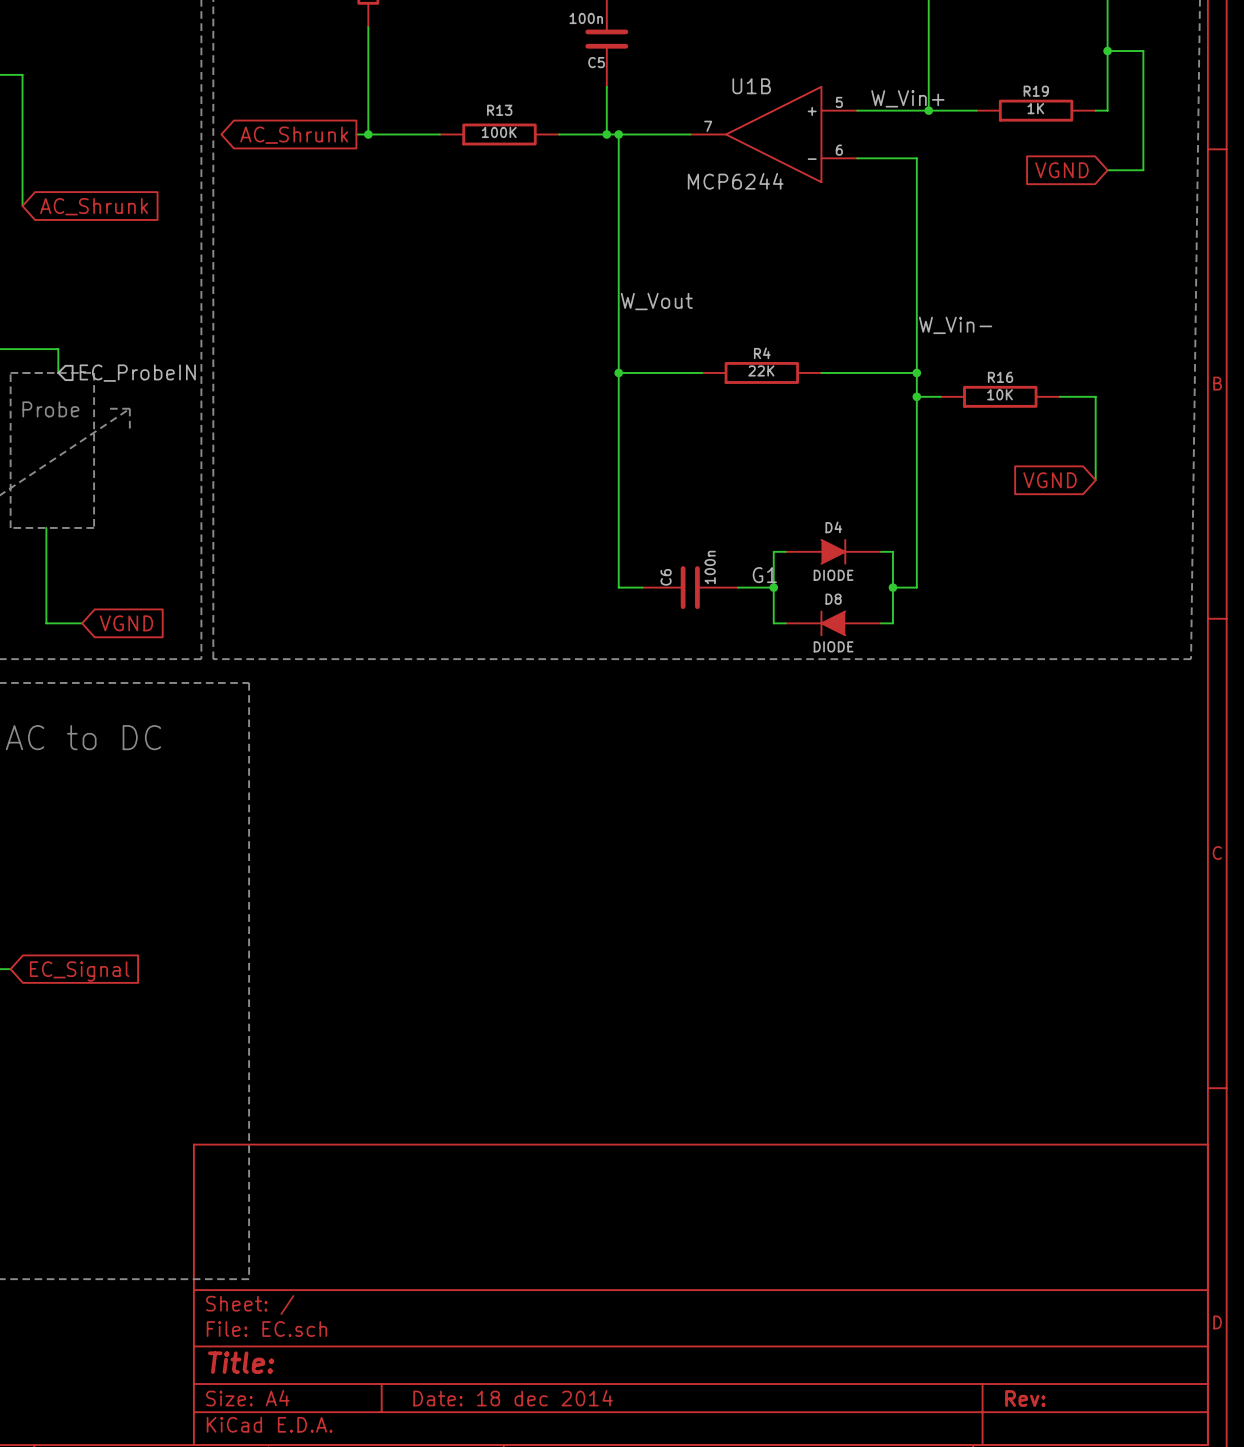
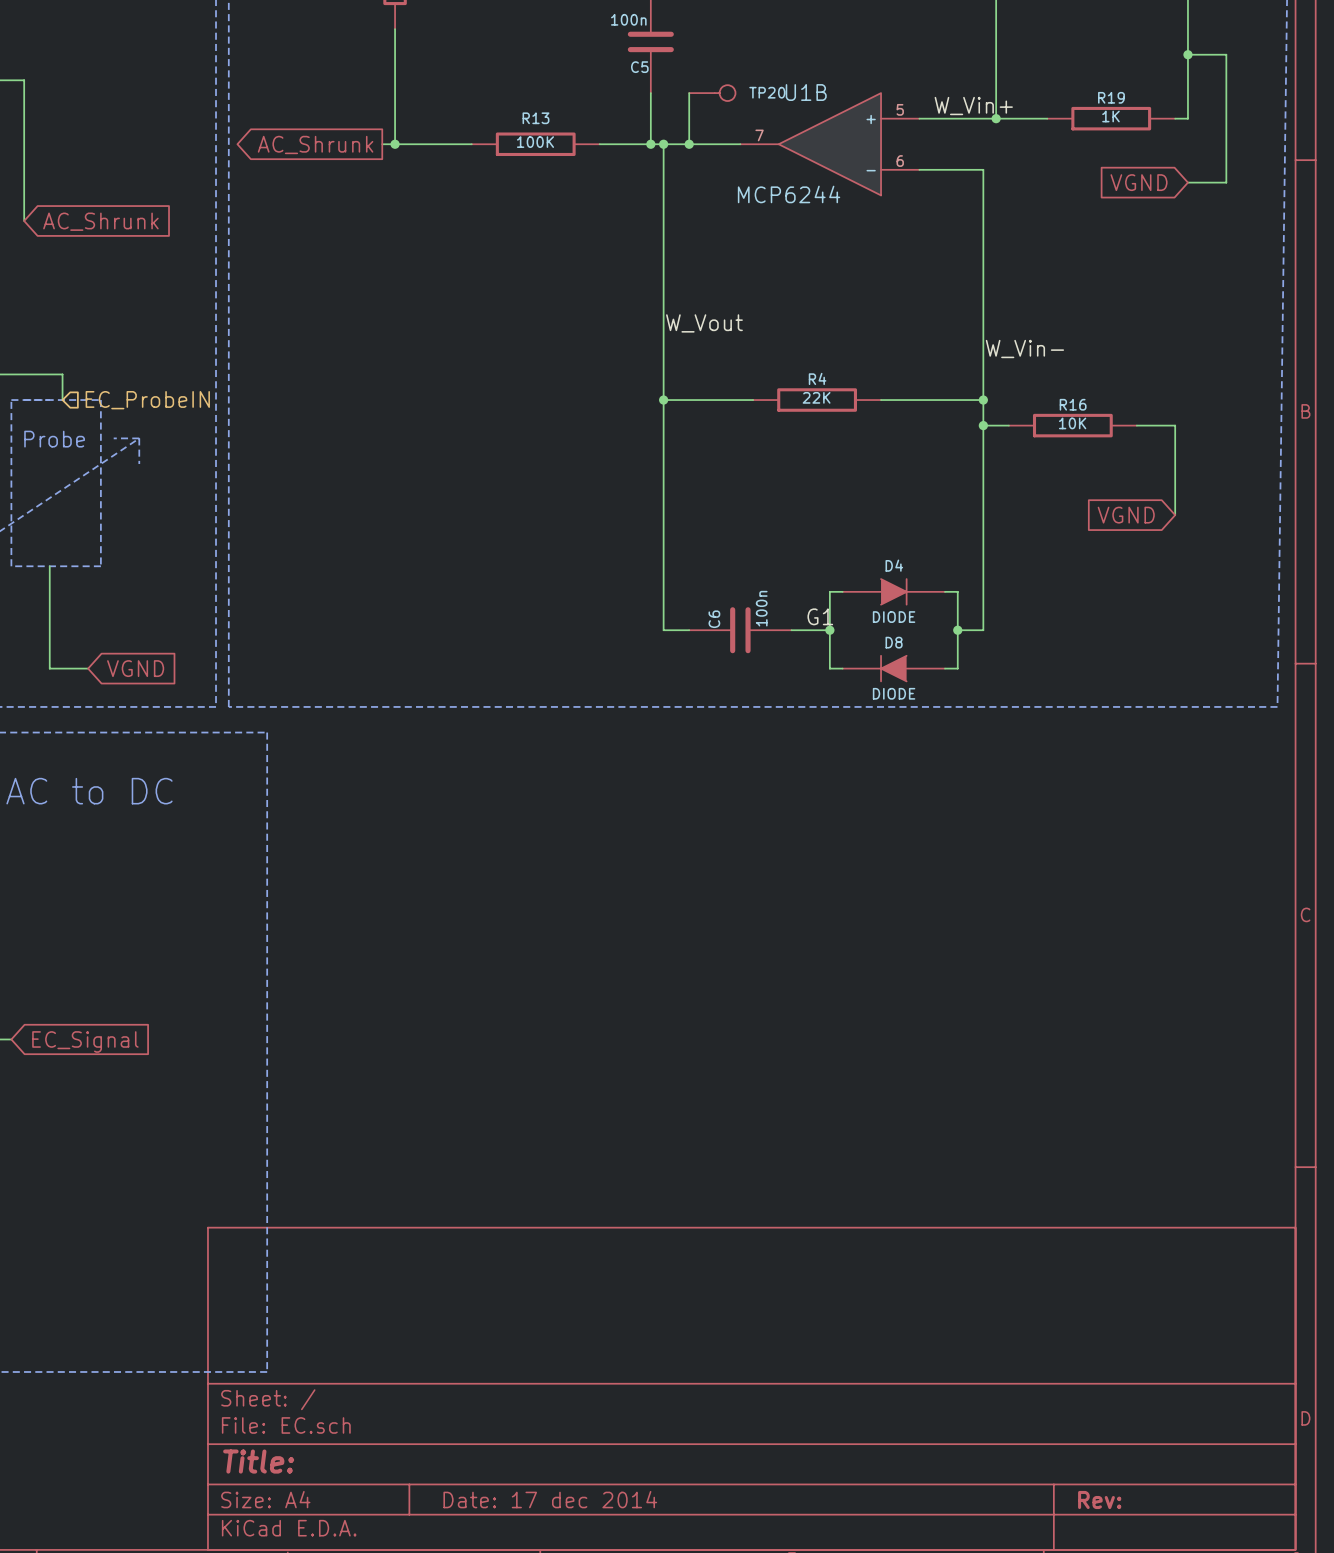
wire: none -> (689, 93) (689, 144)
TP20: none -> (712, 93)
junction: none -> (689, 144)
title block: Date: 18 dec 2014 (513, 1398) -> Date: 17 dec 2014 (550, 1499)

